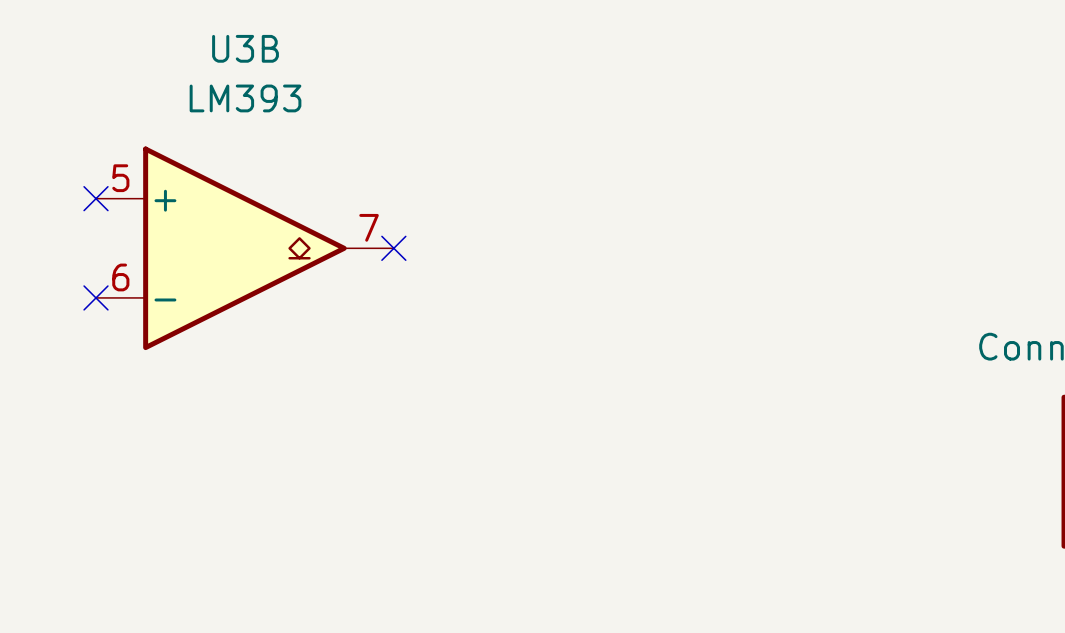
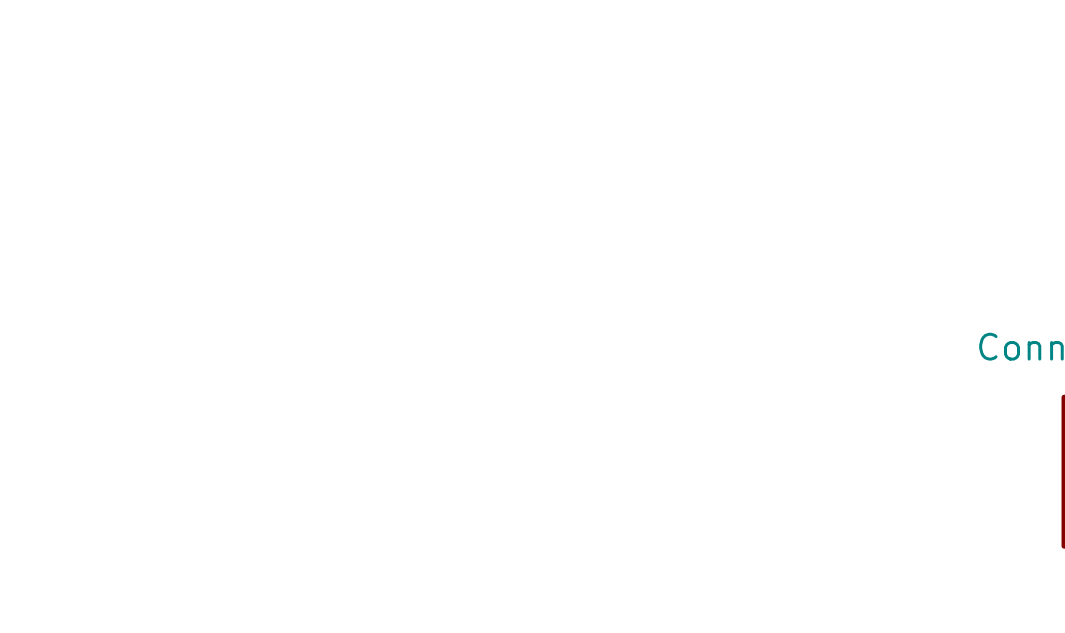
no-connect mark: (96, 198) -> none
U3B: LM393 (244, 248) -> none
no-connect mark: (393, 248) -> none
no-connect mark: (96, 297) -> none

